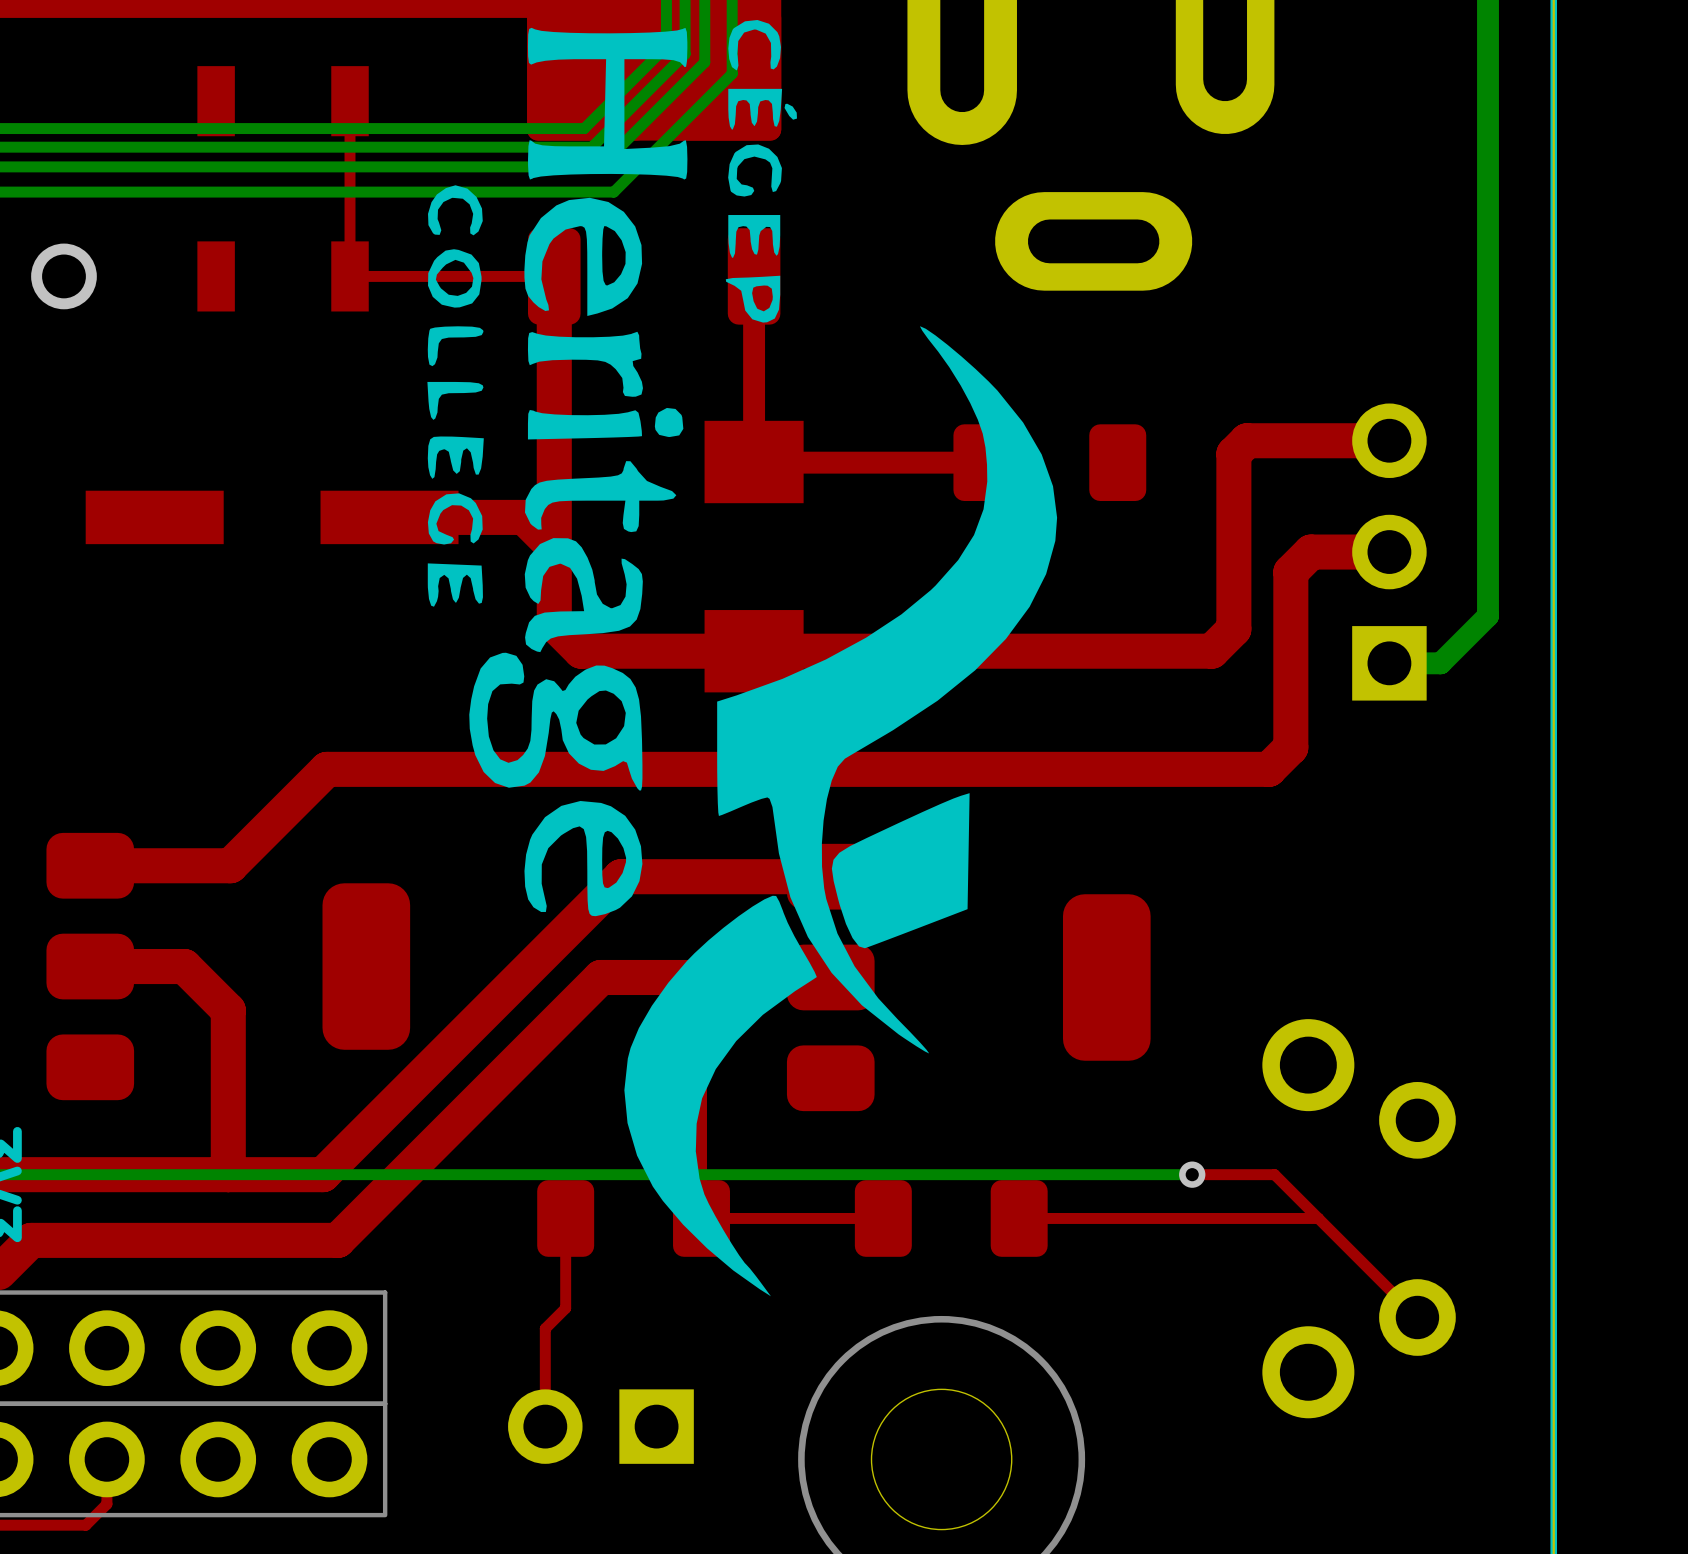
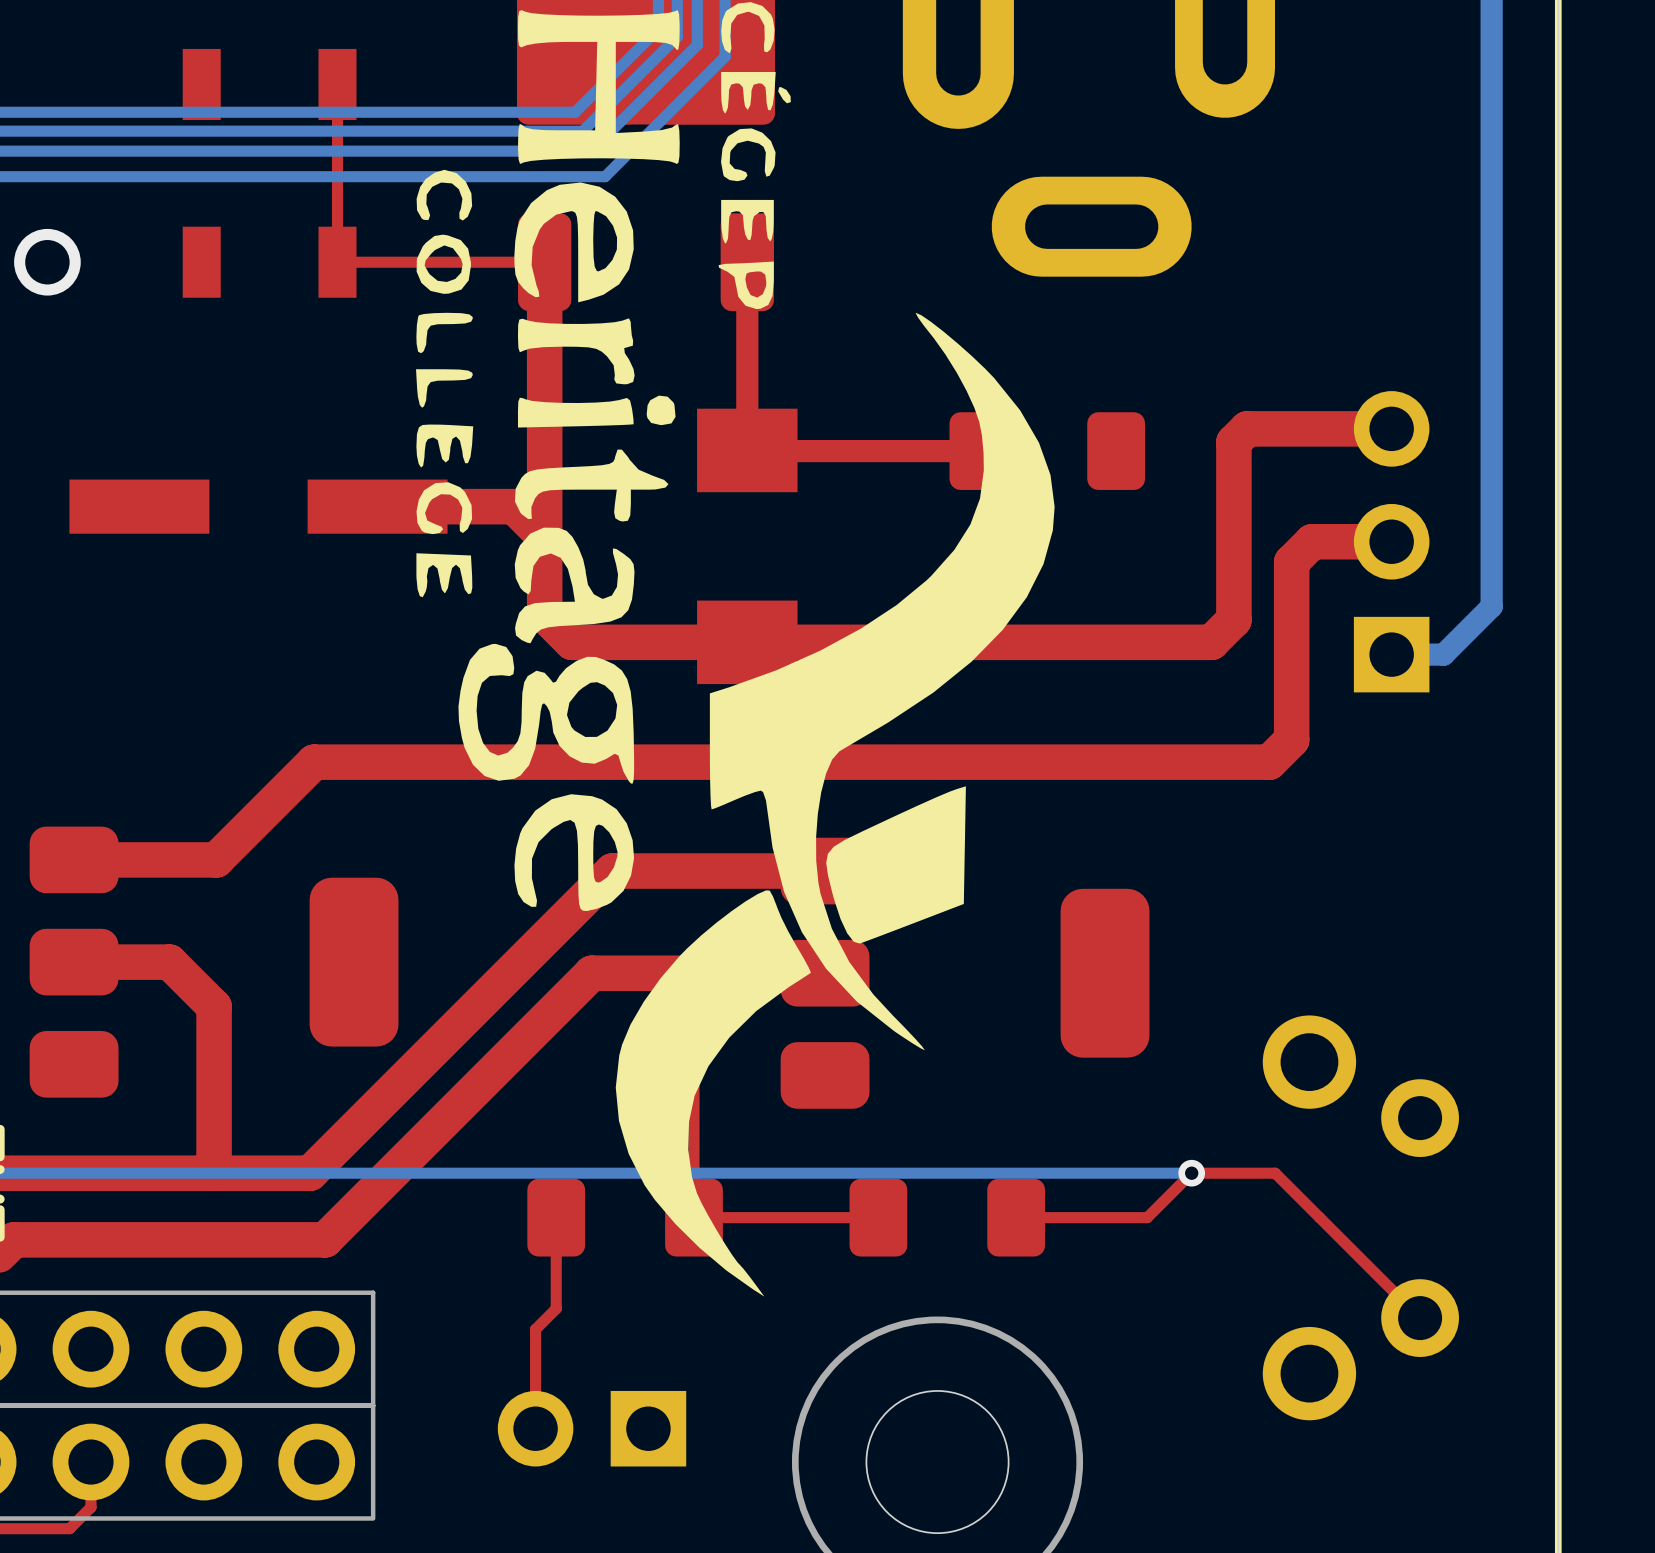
top track: (1318, 1218) (1148, 1218) -> (1191, 1173) (1147, 1217)

